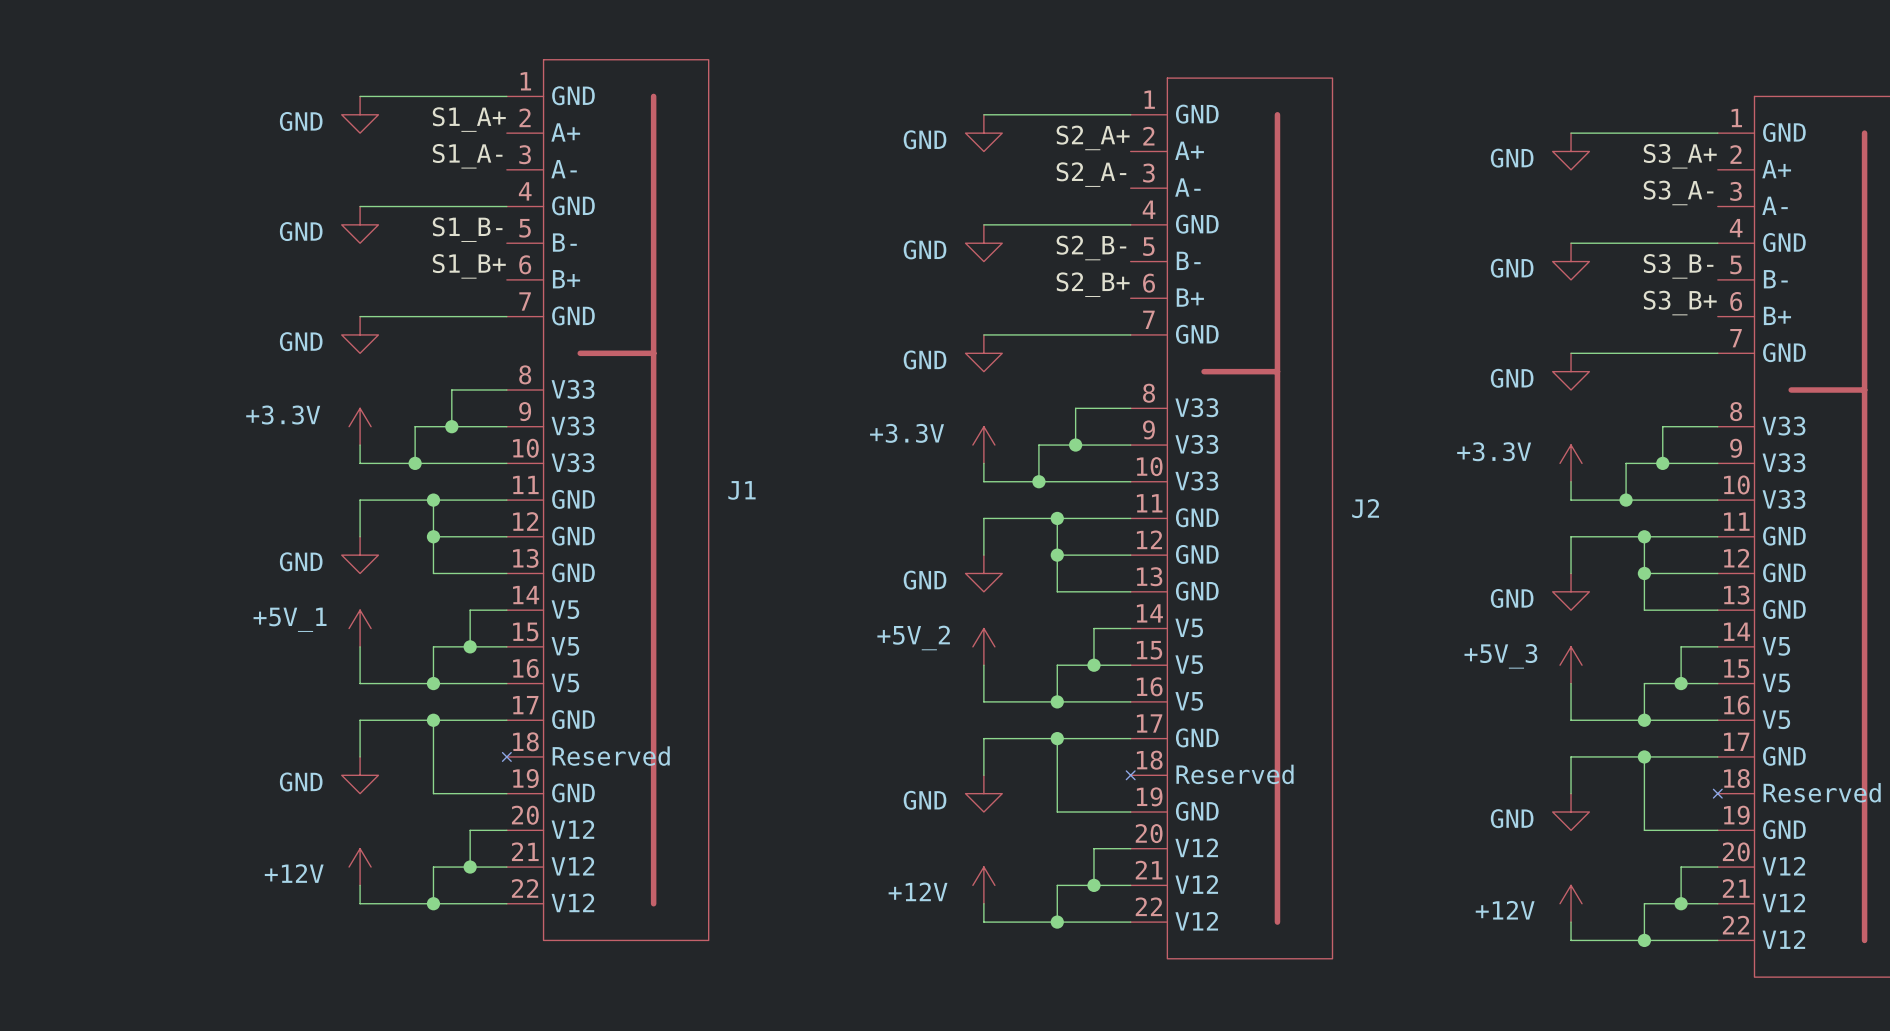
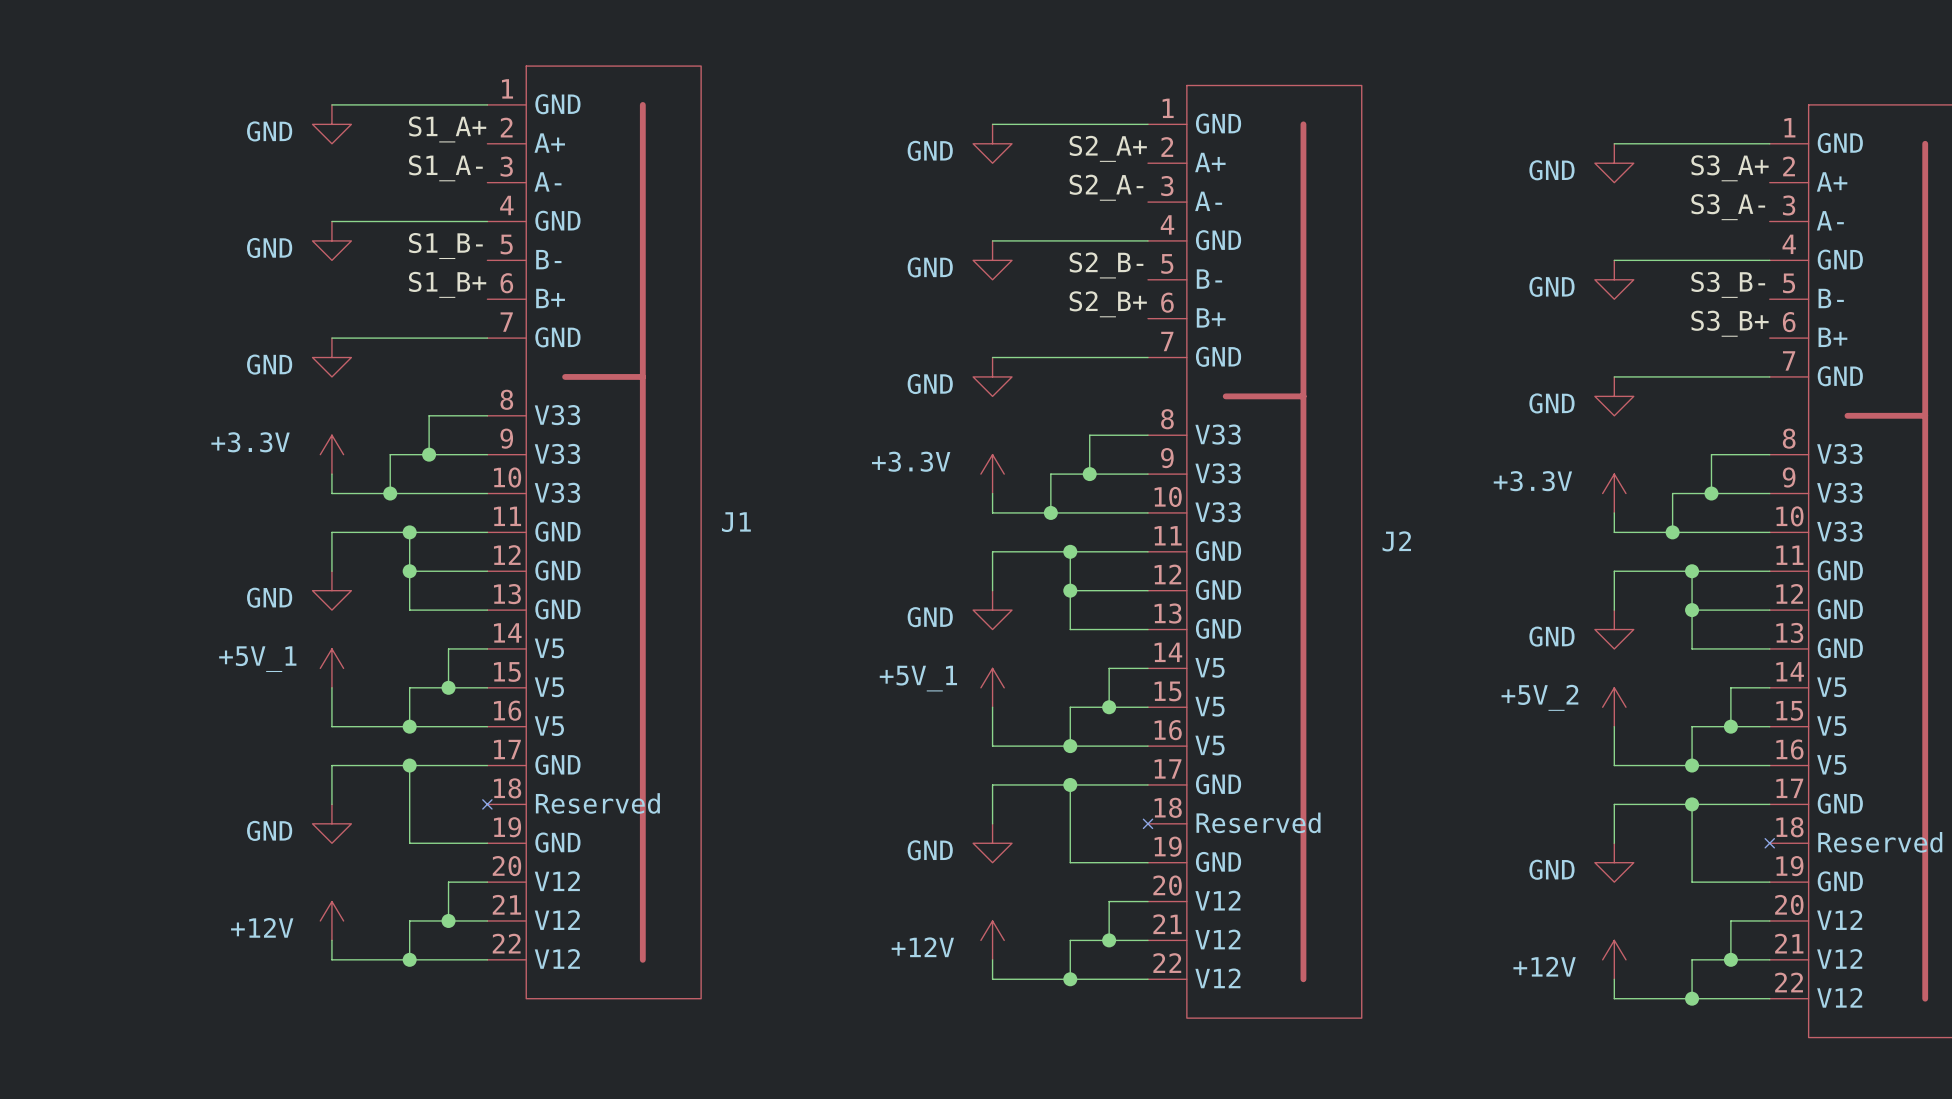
power symbol: +5V_2 (983, 646) -> +5V_1 (992, 687)
power symbol: +5V_3 (1571, 665) -> +5V_2 (1614, 707)

